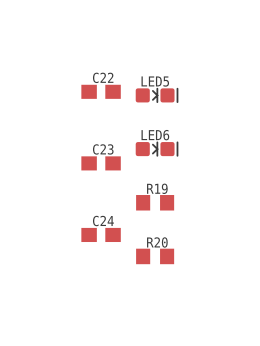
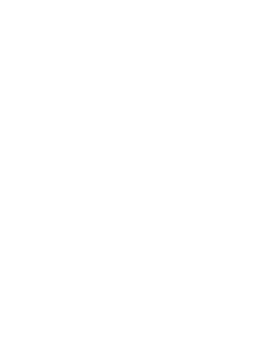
C22: (101, 91) -> none
LED5: (157, 95) -> none
LED6: (157, 149) -> none
C23: (101, 163) -> none
R19: (155, 202) -> none
C24: (101, 234) -> none
R20: (155, 256) -> none

